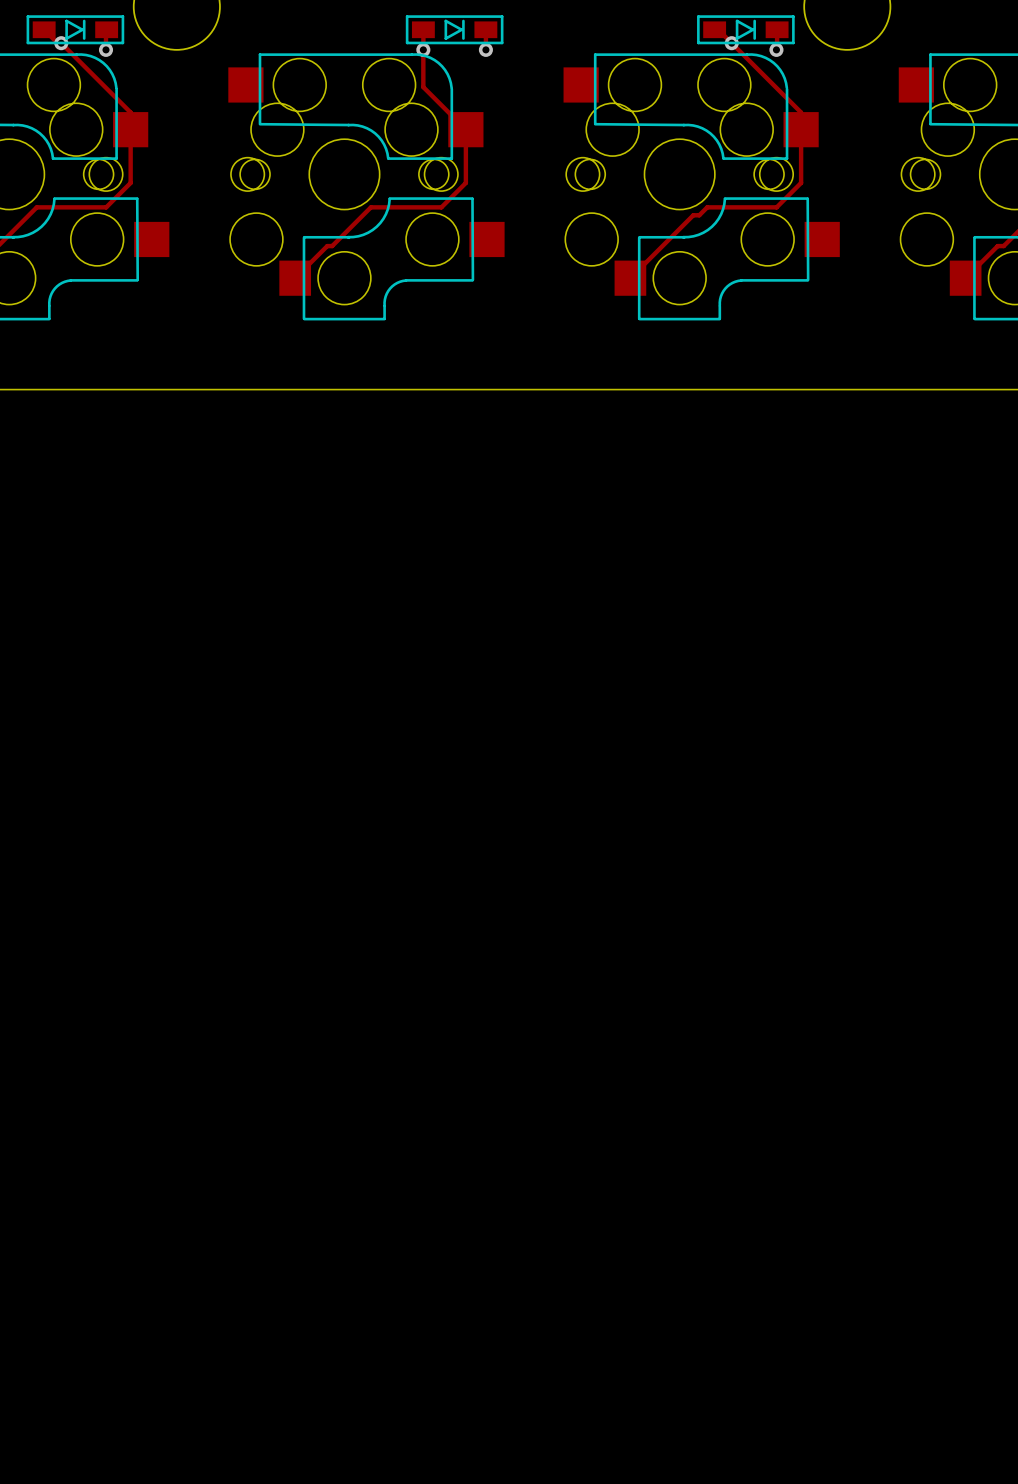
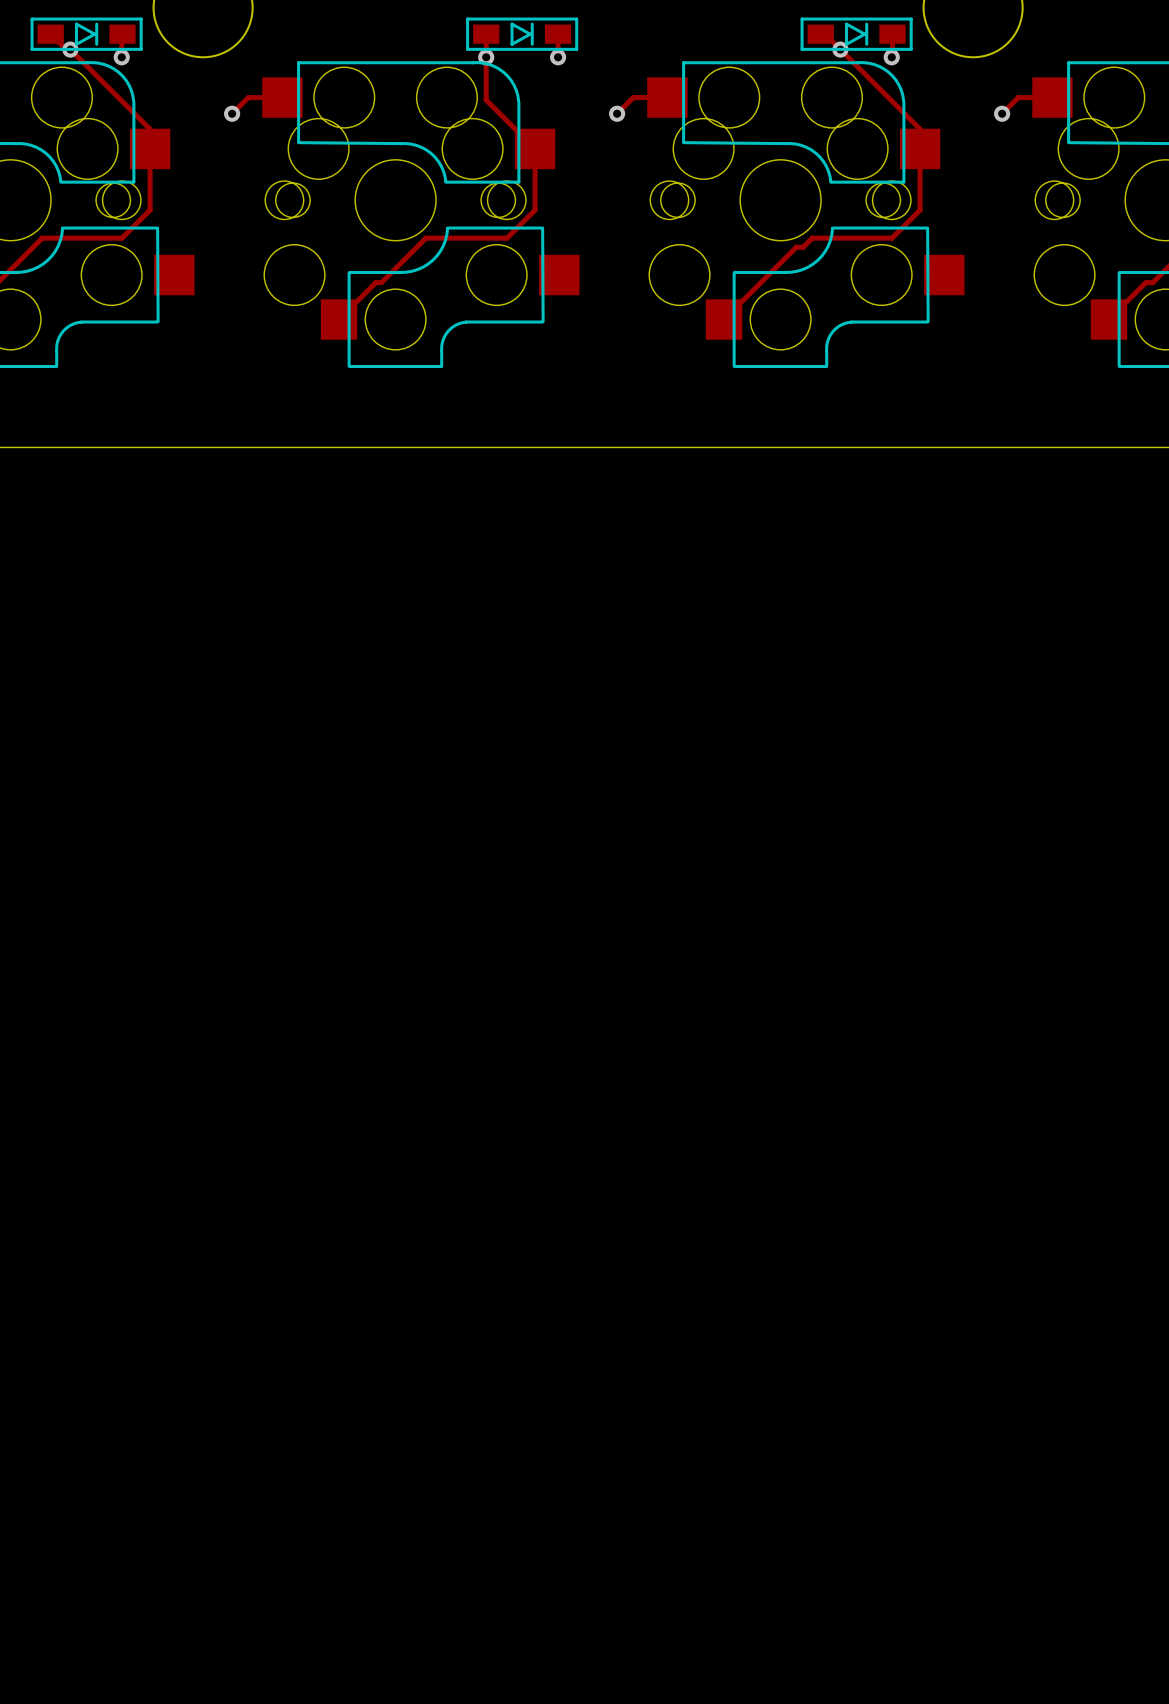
track: none -> (282, 97) (248, 97) (232, 113)
track: none -> (667, 97) (633, 97) (617, 113)
track: none -> (1052, 97) (1018, 97) (1002, 113)
via: none -> (232, 113)
via: none -> (617, 113)
via: none -> (1002, 113)

